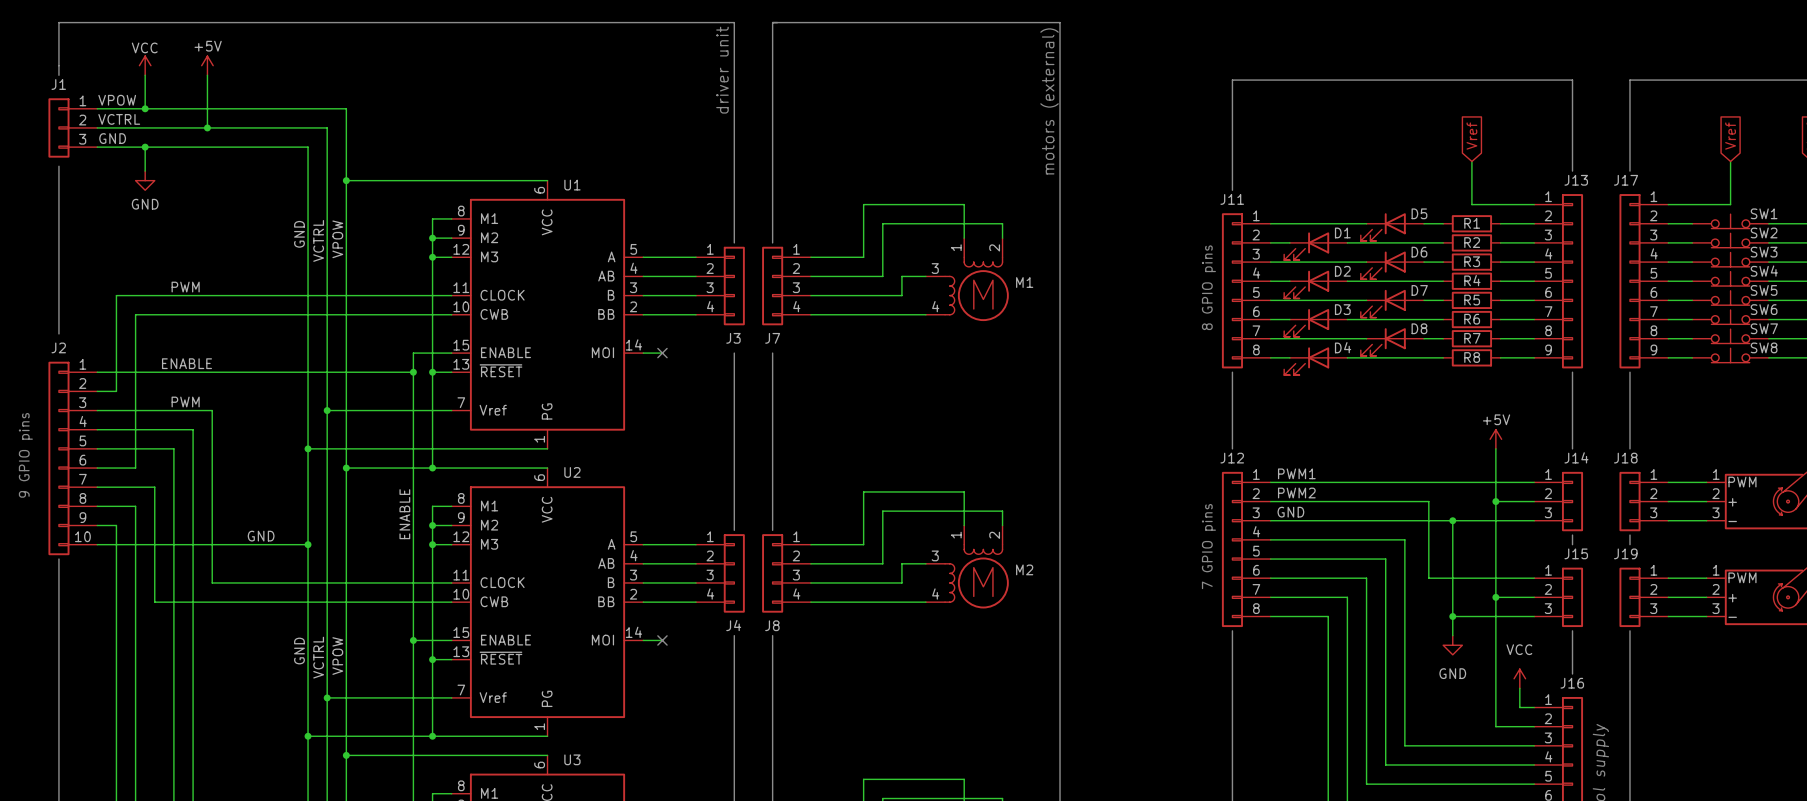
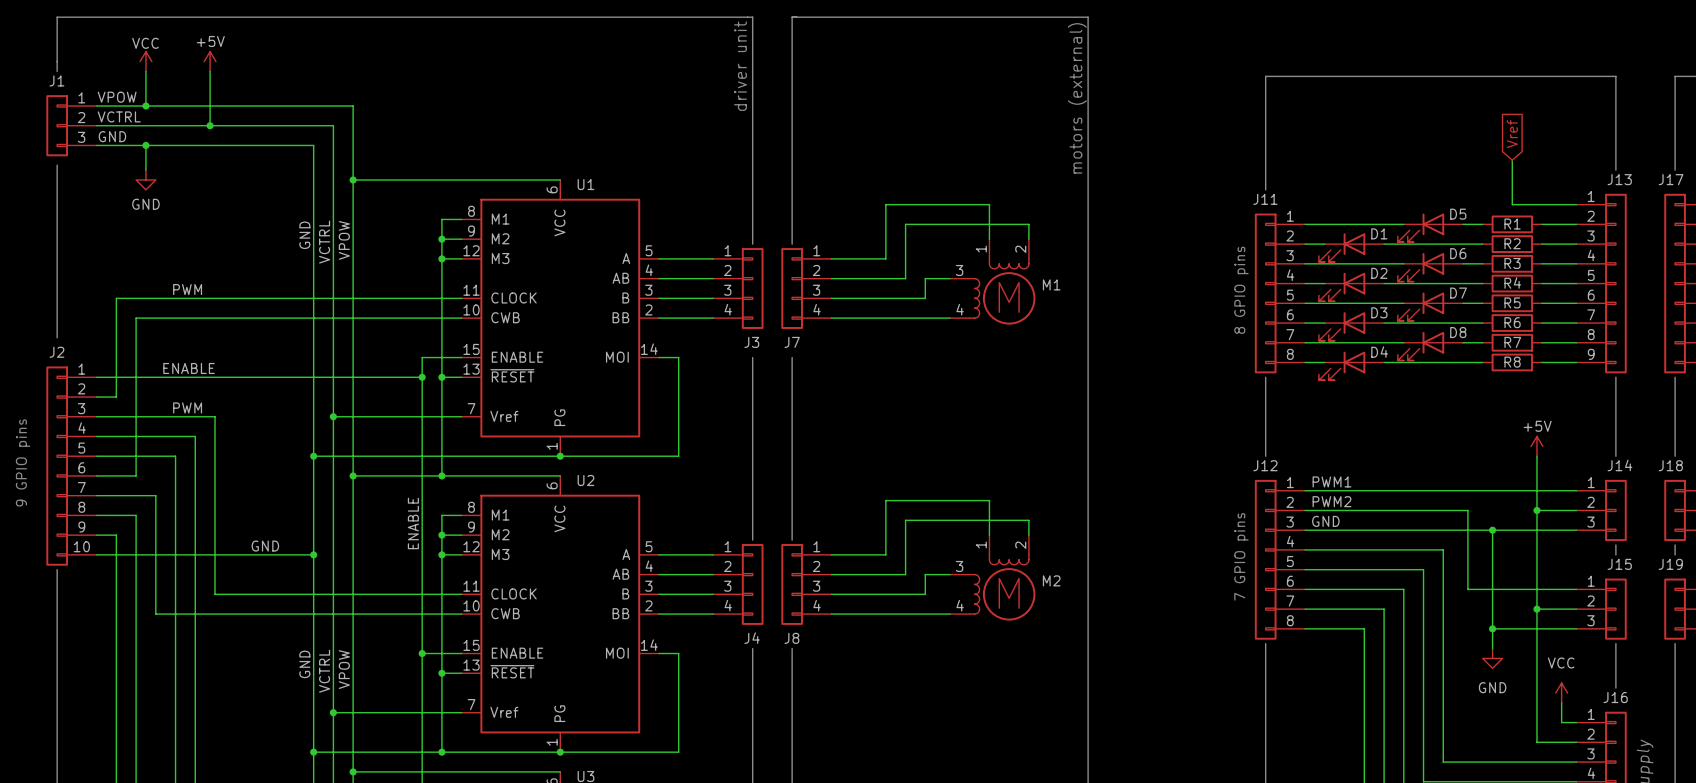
wire: none -> (678, 357) (678, 456) (560, 456)
no-connect mark: (662, 353) -> none
junction: none -> (560, 456)
wire: none -> (678, 653) (678, 752) (560, 752)
no-connect mark: (662, 640) -> none
junction: none -> (560, 752)

